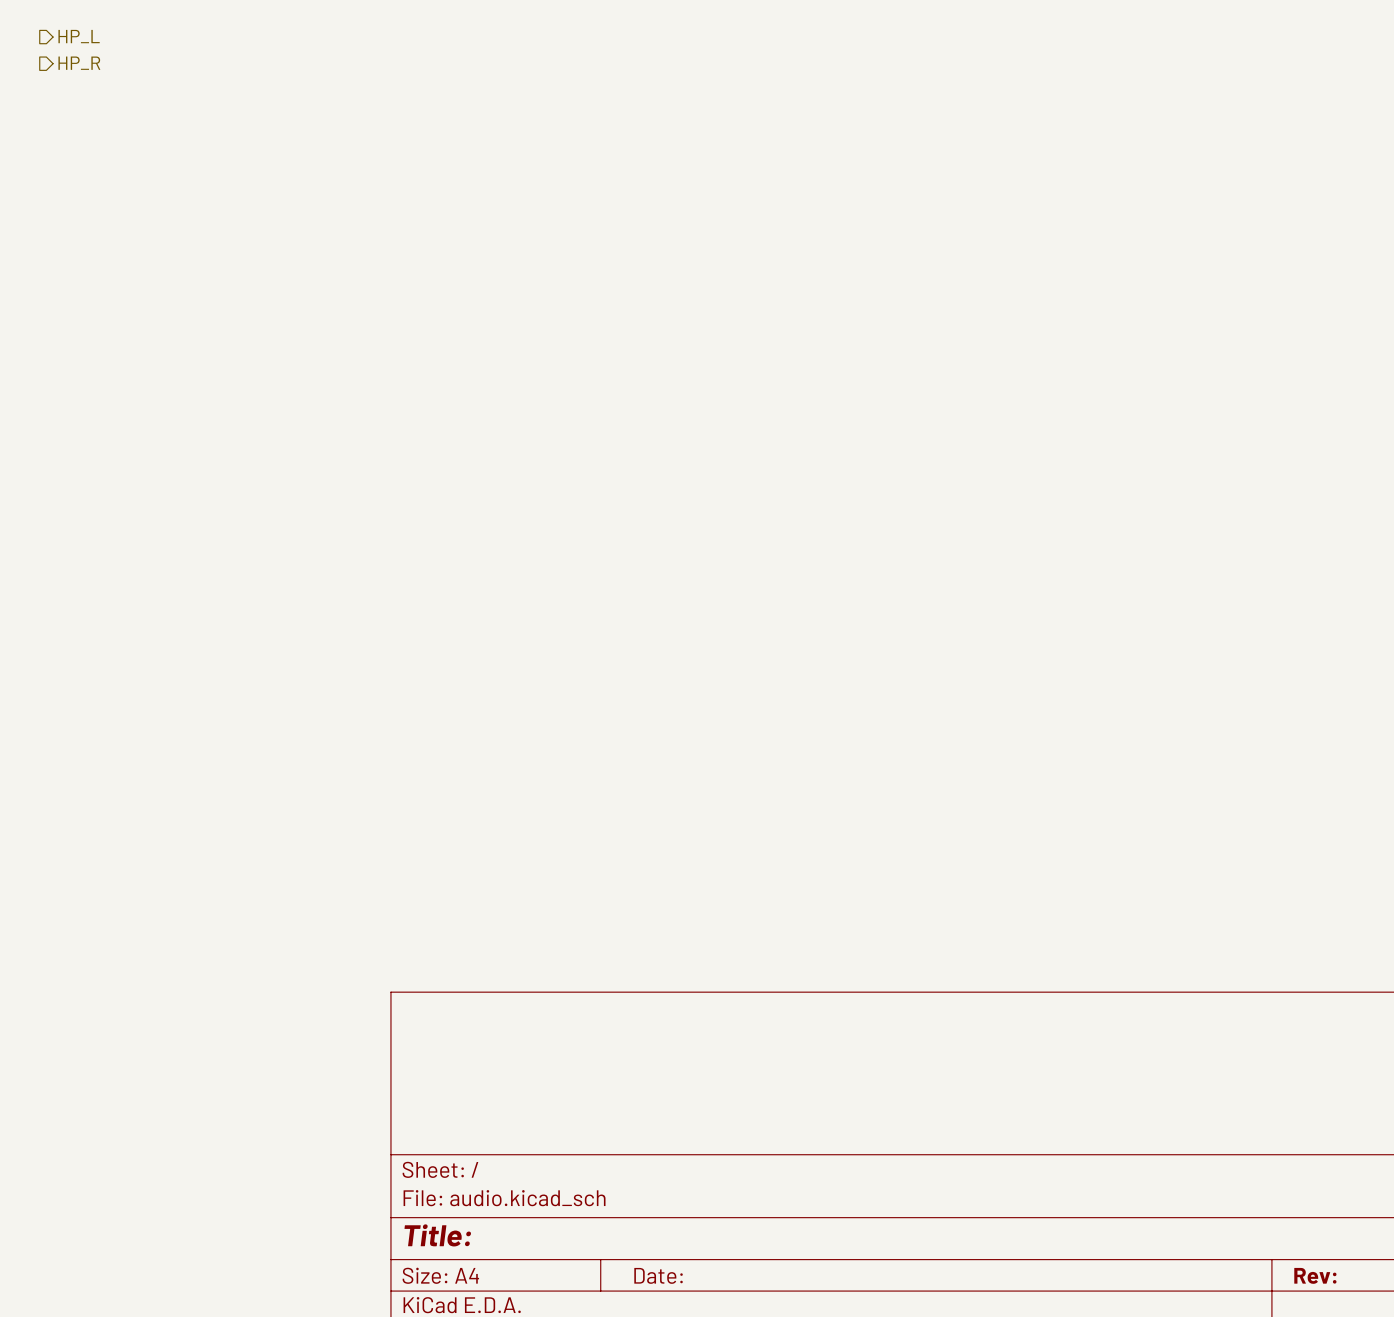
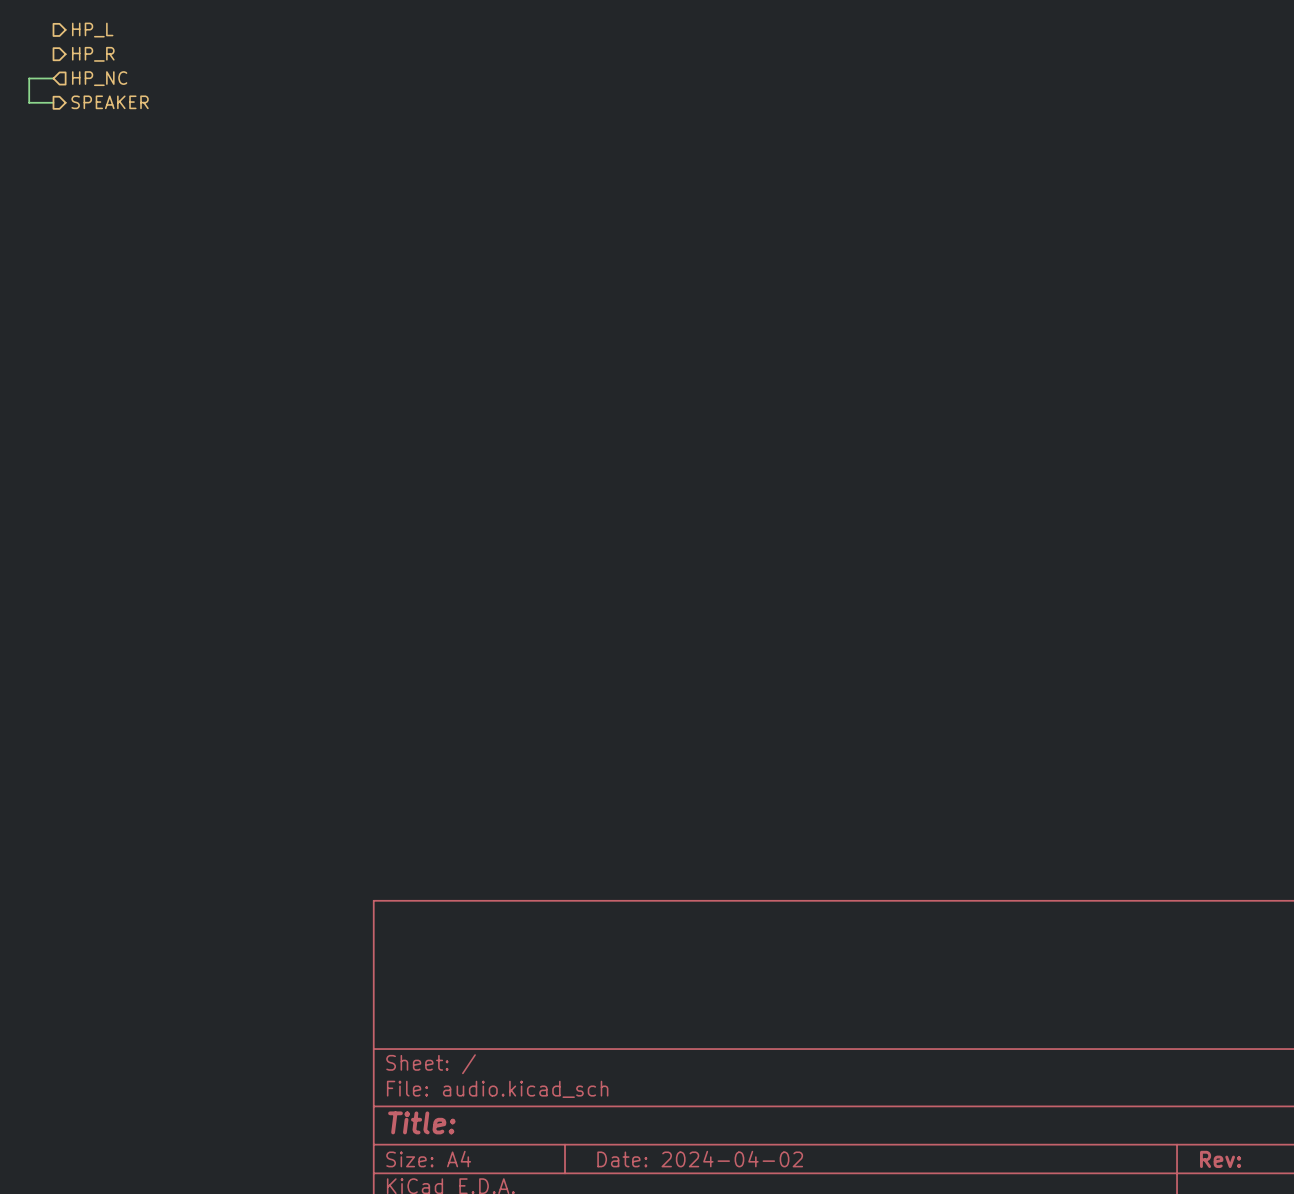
hierarchical label: none -> HP_NC (99, 78)
wire: none -> (53, 78) (29, 78) (29, 102) (53, 102)
hierarchical label: none -> SPEAKER (110, 102)
title block: Date: (658, 1275) -> Date: 2024-04-02 (700, 1159)

